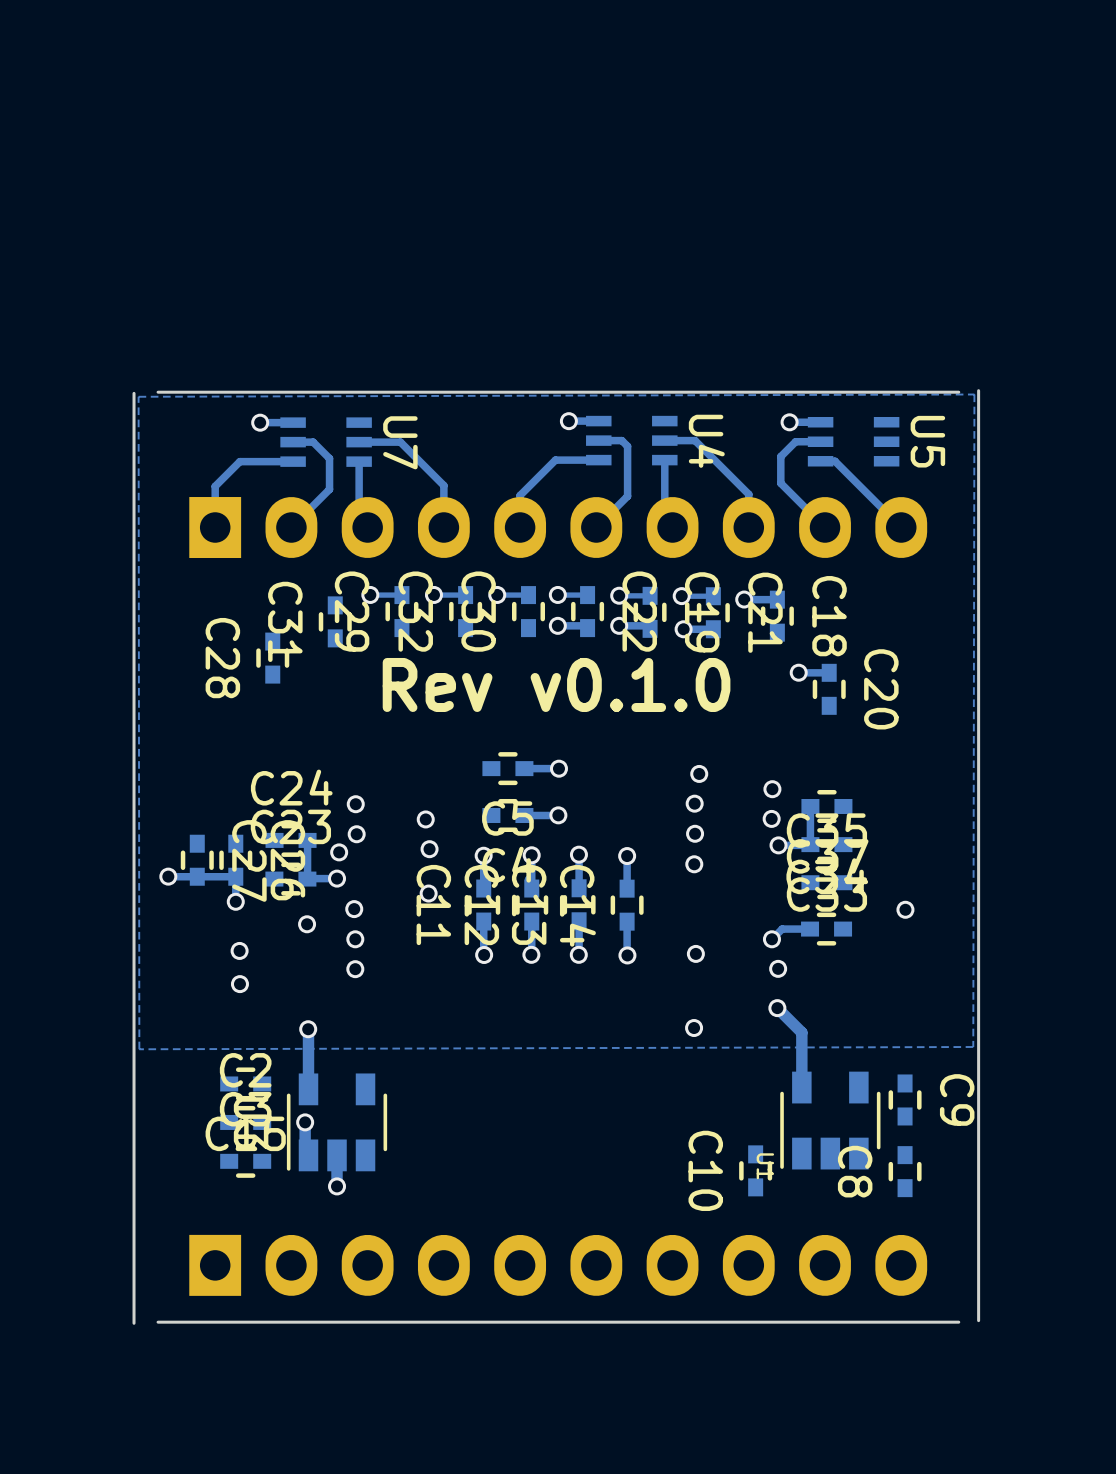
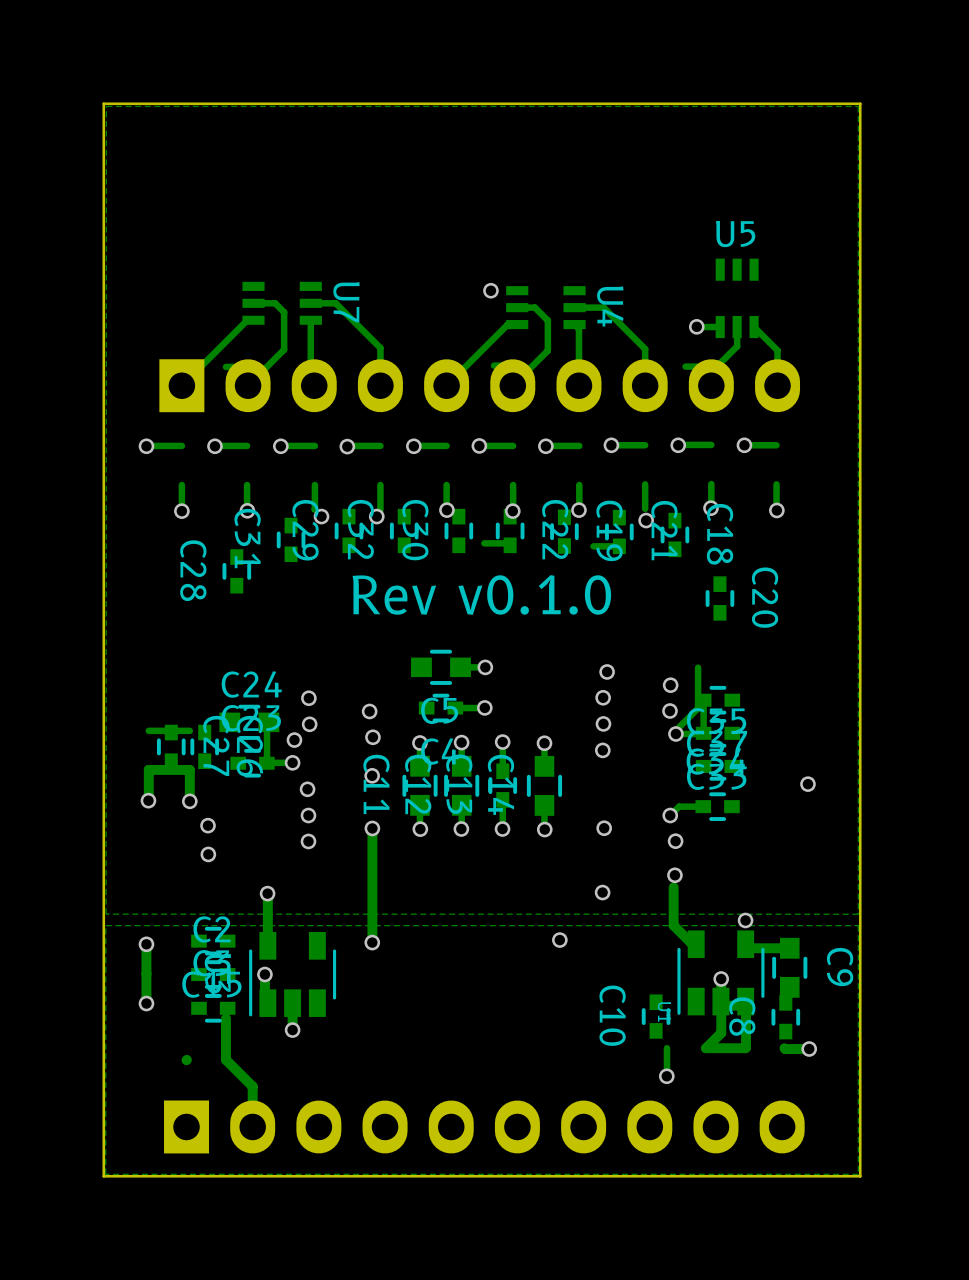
board edge: none -> (860, 103) (860, 1176) (103, 1176) (103, 103) (860, 103)
via: none -> (490, 290)
track: none -> (253, 303) (275, 303) (284, 312) (284, 349) (248, 385)
track: none -> (310, 303) (335, 303) (380, 348) (380, 385)
track: none -> (517, 307) (534, 307) (547, 320) (547, 350) (512, 385)
track: none -> (574, 307) (603, 307) (645, 348) (645, 385)
track: none -> (253, 320) (247, 320) (181, 385)
track: none -> (310, 320) (310, 382) (314, 385)
track: none -> (517, 324) (507, 324) (446, 385)
track: none -> (574, 324) (578, 328) (578, 385)
via: none -> (696, 326)
track: none -> (720, 327) (696, 327)
track: none -> (737, 327) (737, 346) (711, 372) (711, 385)
track: none -> (754, 327) (777, 350) (777, 385)
board edge: (978, 390) (978, 1320) -> none
board edge: (958, 392) (158, 392) -> none
board edge: (134, 393) (134, 1323) -> none
zone outline: (974, 394) (138, 396) (139, 1049) (973, 1046) (974, 394) -> (858, 106) (858, 914) (106, 914) (106, 106) (858, 106)
via: (568, 421) -> none
via: (260, 422) -> none
via: (789, 422) -> none
track: (598, 440) (621, 440) (627, 446) (627, 496) (596, 527) -> none
U4 position: (631, 440) -> (545, 307)
track: (664, 440) (695, 440) (748, 494) (748, 527) -> none
track: (820, 441) (795, 441) (780, 456) (780, 483) (825, 527) -> none
U5 rotation: 0° (853, 441) -> 90° clockwise (737, 298)
U5 position: (853, 441) -> (737, 298)
U5 name position: U5 (927, 441) -> U5 (735, 234)
track: (293, 442) (313, 442) (329, 458) (329, 489) (291, 527) -> none
U7 position: (326, 442) -> (282, 303)
track: (359, 442) (400, 442) (443, 485) (443, 527) -> none
track: (598, 460) (555, 460) (520, 495) (520, 527) -> none
track: (664, 460) (664, 519) (672, 527) -> none
track: (293, 461) (239, 461) (215, 486) (215, 527) -> none
track: (359, 461) (359, 518) (367, 527) -> none
track: (820, 461) (835, 461) (901, 527) -> none
via: none -> (611, 445)
track: none -> (645, 445) (611, 445)
via: none -> (678, 445)
track: none -> (711, 444) (678, 444)
via: none -> (744, 445)
track: none -> (776, 445) (744, 445)
track: none -> (181, 445) (146, 445)
track: none -> (247, 445) (215, 445)
track: none -> (314, 445) (281, 445)
track: none -> (380, 445) (347, 446)
track: none -> (446, 445) (414, 445)
via: none -> (479, 445)
track: none -> (513, 445) (479, 445)
track: none -> (579, 445) (546, 445)
via: none -> (146, 446)
via: none -> (214, 446)
via: none -> (280, 446)
via: none -> (347, 446)
via: none -> (413, 446)
via: none -> (545, 446)
part position: (558, 527) -> (479, 385)
track: none -> (645, 484) (645, 508)
track: none -> (711, 484) (711, 507)
track: none -> (776, 484) (776, 510)
track: none -> (181, 485) (181, 511)
track: none -> (247, 485) (247, 510)
track: none -> (314, 485) (314, 509)
track: none -> (380, 485) (380, 510)
track: none -> (446, 485) (446, 509)
track: none -> (513, 485) (513, 510)
track: none -> (579, 485) (579, 509)
via: none -> (711, 508)
via: none -> (776, 510)
via: none -> (181, 511)
via: none -> (247, 510)
via: none -> (512, 511)
via position: (497, 594) -> (446, 510)
via: (557, 594) -> none
track: (401, 595) (370, 595) -> none
track: (465, 595) (434, 595) -> none
track: (528, 595) (497, 595) -> none
track: (587, 595) (557, 595) -> none
via: (619, 595) -> none
track: (650, 595) (619, 595) -> none
via position: (681, 596) -> (578, 510)
track: (713, 596) (681, 596) -> none
track: (777, 599) (744, 599) -> none
via: (557, 625) -> none
track: (619, 625) (647, 625) (650, 628) -> none
via: (619, 625) -> none
via: (683, 629) -> none
via: (798, 672) -> none
track: (829, 672) (798, 672) -> none
C5 footprint: [482, 752, 534, 786] -> [411, 649, 471, 685]
track: none -> (698, 667) (698, 708) (674, 732)
C24 footprint: [265, 823, 317, 857] -> [219, 704, 280, 740]
track: none -> (189, 730) (148, 730)
track: (168, 876) (235, 876) (235, 901) -> none
via: (168, 876) -> none
C11 footprint: [467, 879, 501, 931] -> [402, 755, 438, 816]
C12 footprint: [515, 879, 549, 931] -> [444, 755, 480, 816]
C14 footprint: [610, 879, 644, 931] -> [526, 755, 563, 816]
via position: (235, 901) -> (189, 801)
via position: (905, 909) -> (807, 784)
track: none -> (148, 800) (148, 769) (189, 769) (189, 801)
via: none -> (148, 800)
via: (307, 924) -> none
track: none -> (372, 828) (372, 942)
via: none -> (372, 828)
track: (777, 1008) (801, 1032) (801, 1087) -> none
track: none -> (673, 887) (673, 925) (696, 948)
via: none -> (745, 920)
zone outline: none -> (858, 925) (858, 1174) (105, 1174) (105, 925) (858, 925)
C9 footprint: [888, 1074, 922, 1126] -> [772, 937, 808, 998]
via: none -> (559, 940)
via: none -> (372, 942)
track: none -> (146, 944) (146, 1003)
via: none -> (146, 944)
track: none -> (789, 948) (746, 948)
C9 name position: C9 (957, 1099) -> C9 (840, 967)
track: none -> (721, 979) (721, 1033) (706, 1048) (745, 1048) (746, 1005) (721, 1005)
via: none -> (721, 978)
via: none -> (146, 1003)
track: none -> (225, 1018) (225, 1059) (252, 1086) (252, 1126)
track: none -> (666, 1048) (666, 1076)
track: none -> (784, 1048) (809, 1049)
via: none -> (809, 1049)
track: none -> (186, 1059) (186, 1060)
via: none -> (666, 1076)
part position: (558, 1265) -> (484, 1126)
board edge: (958, 1322) (158, 1322) -> none

